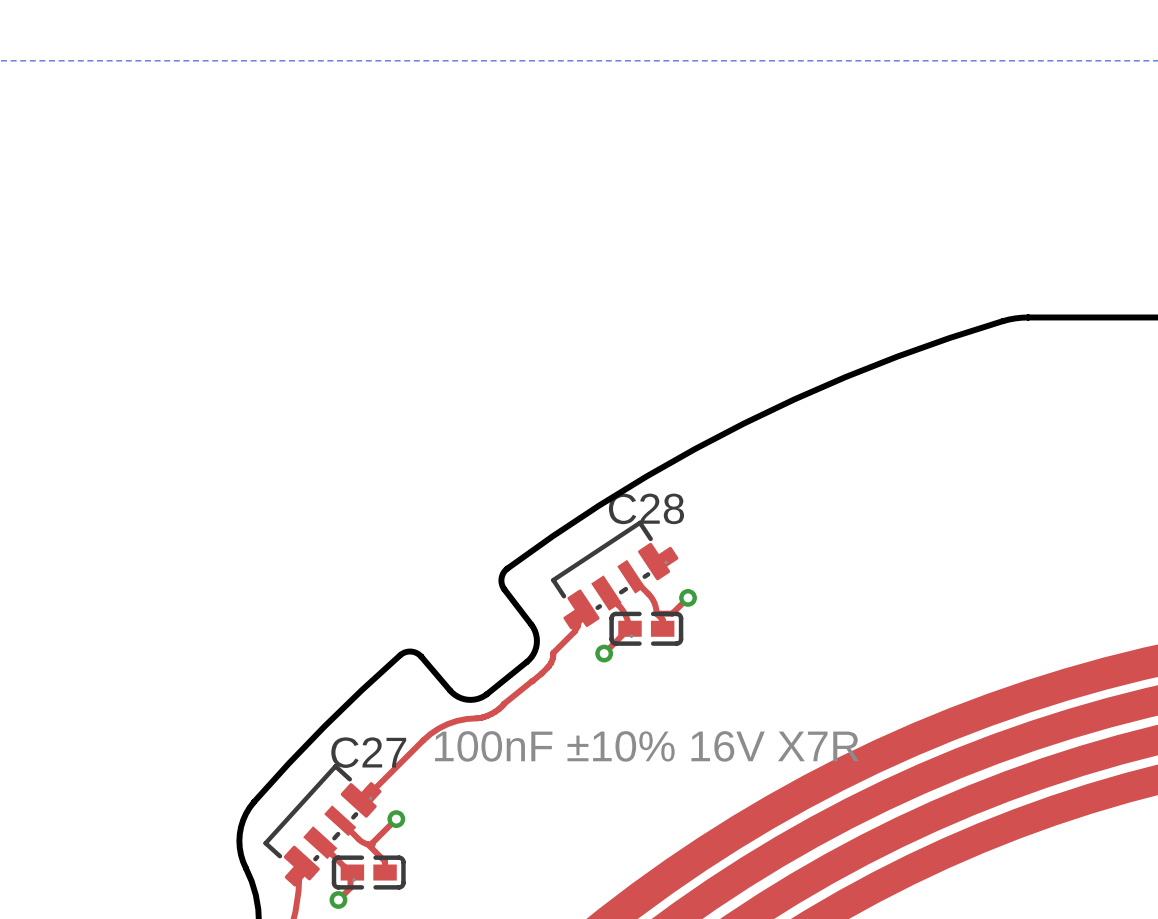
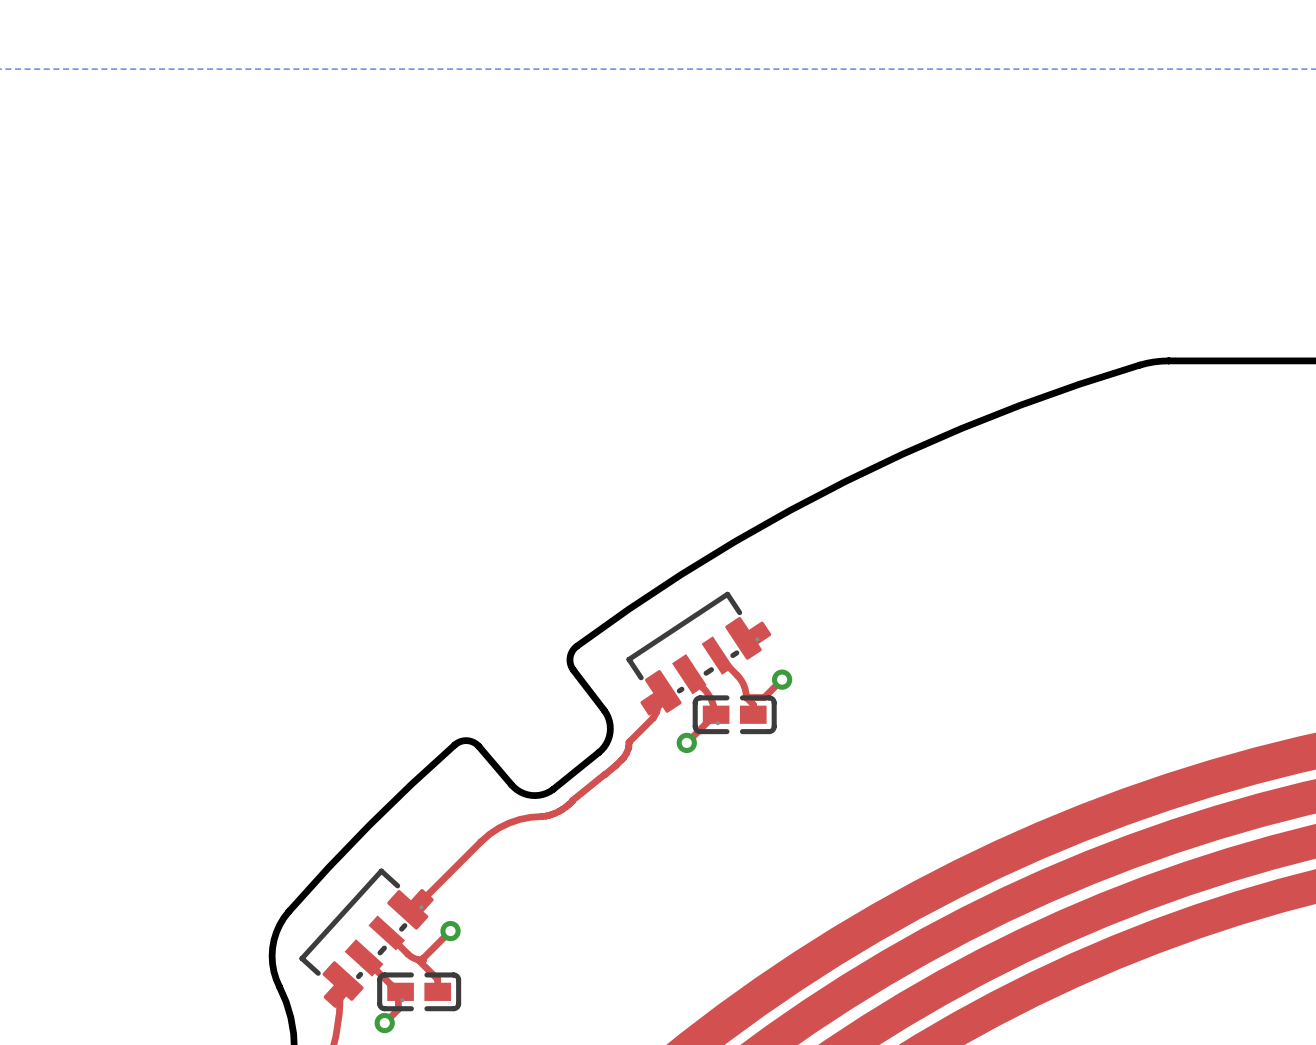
C28 name: C28 (646, 508) -> none
C28 value: 100nF ±10% 16V X7R (646, 746) -> none
C27 name: C27 (368, 752) -> none

